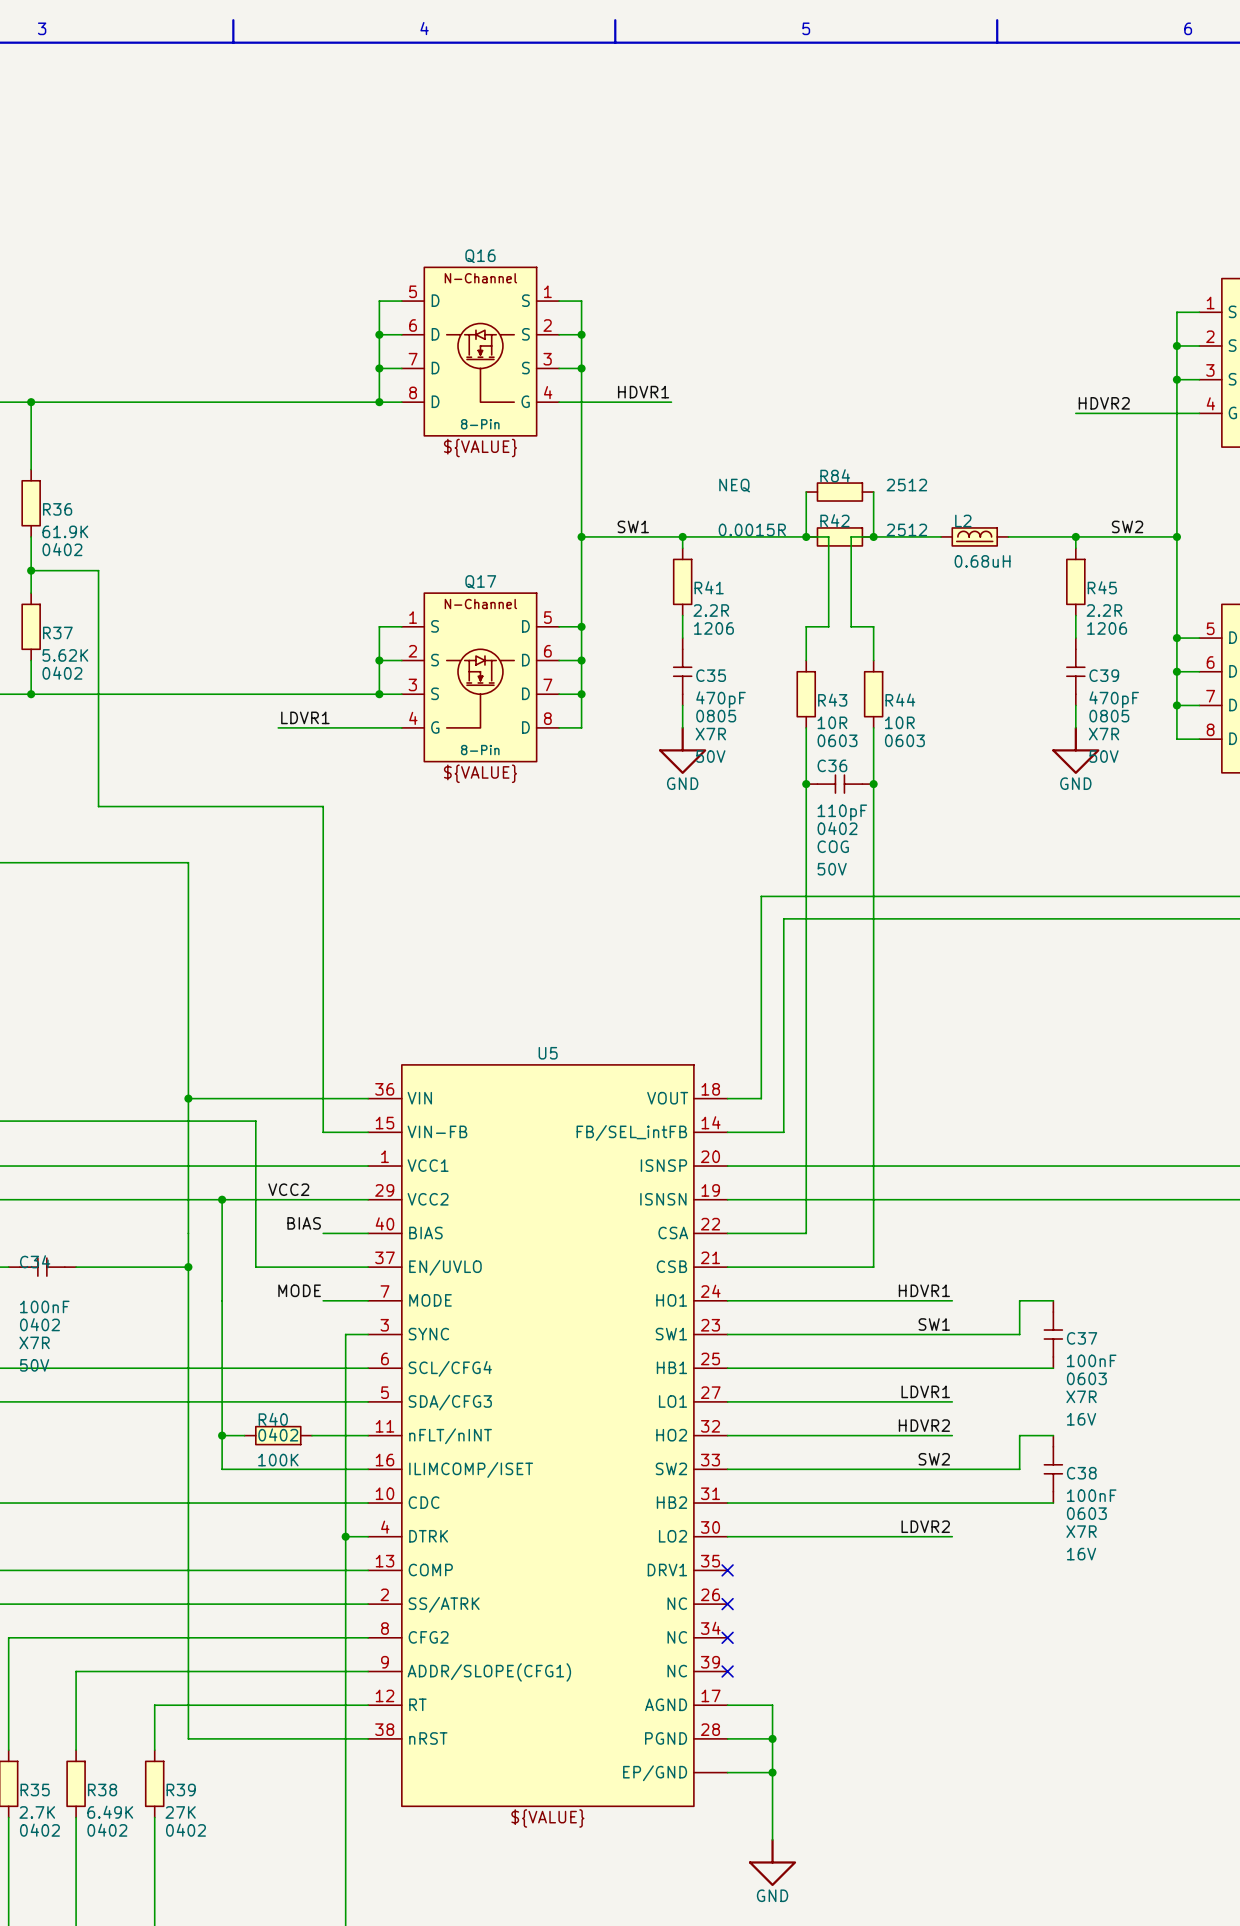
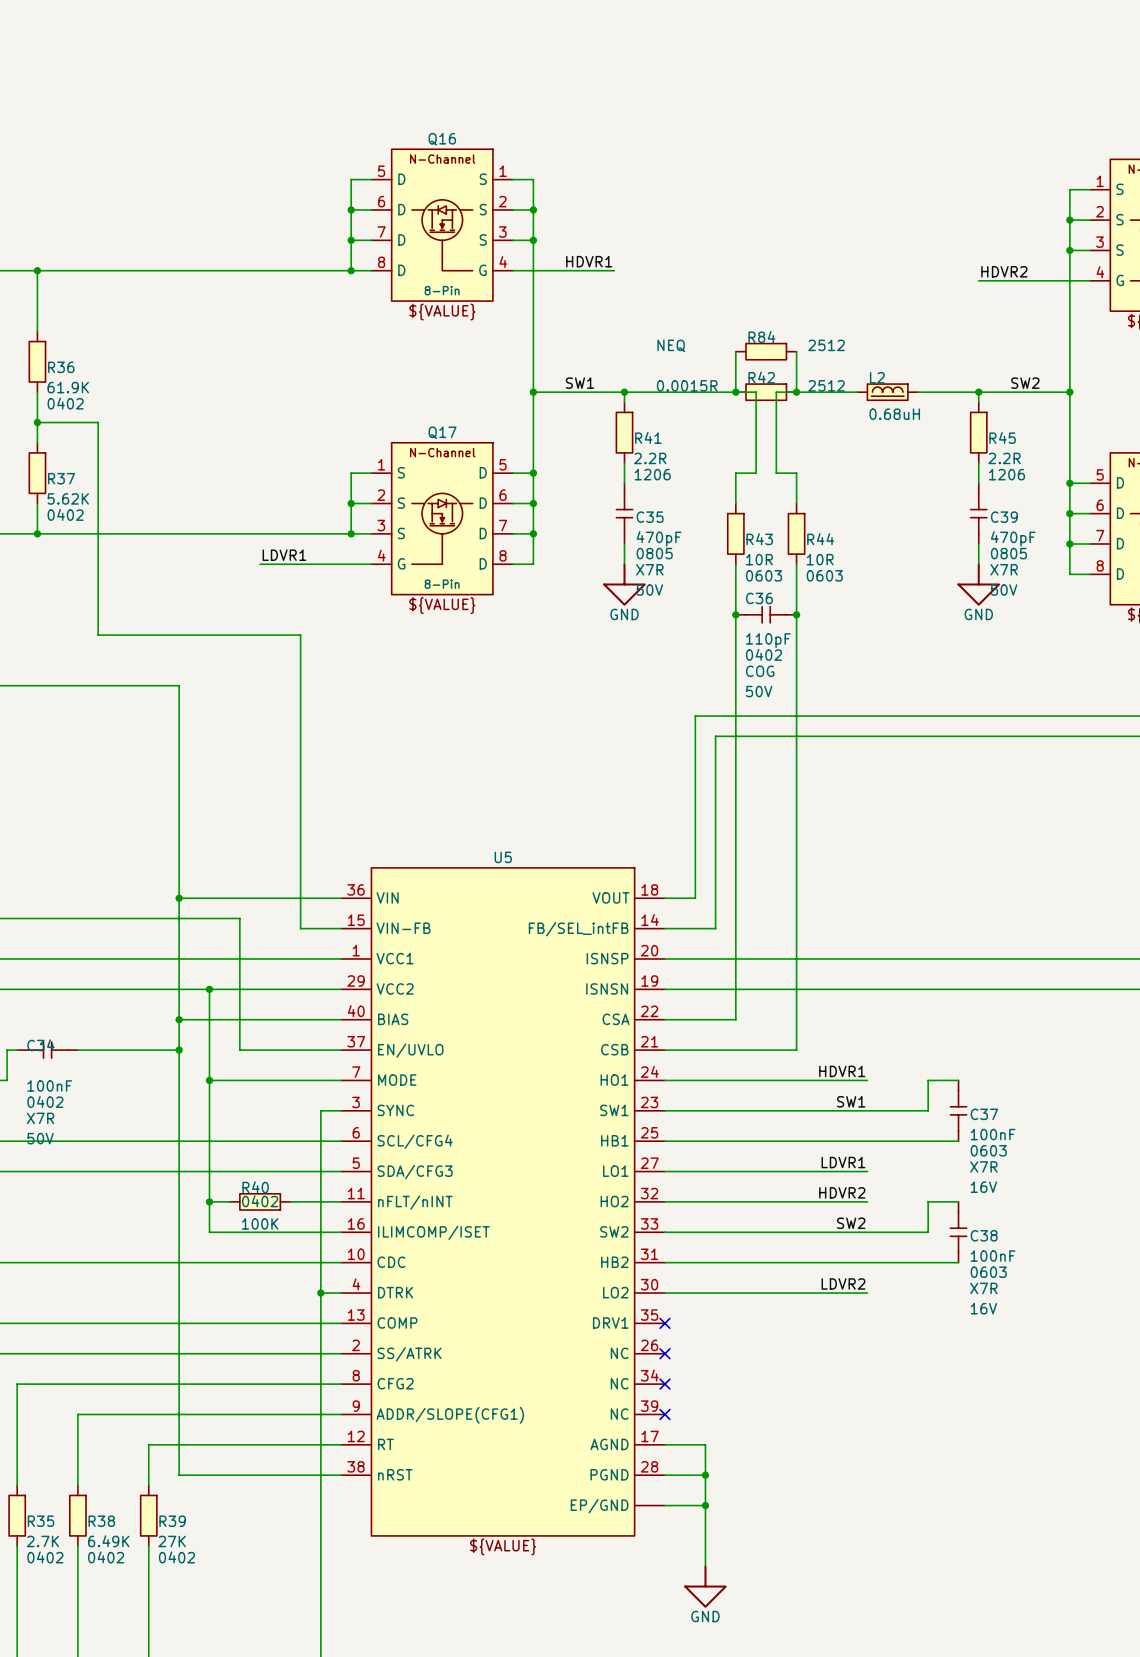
label: VCC2 (288, 1189) -> none
label: BIAS (304, 1223) -> none
wire: none -> (179, 1019) (300, 1019)
junction: none -> (179, 1019)
label: MODE (299, 1290) -> none
wire: none -> (209, 1080) (300, 1080)
junction: none -> (209, 1080)

